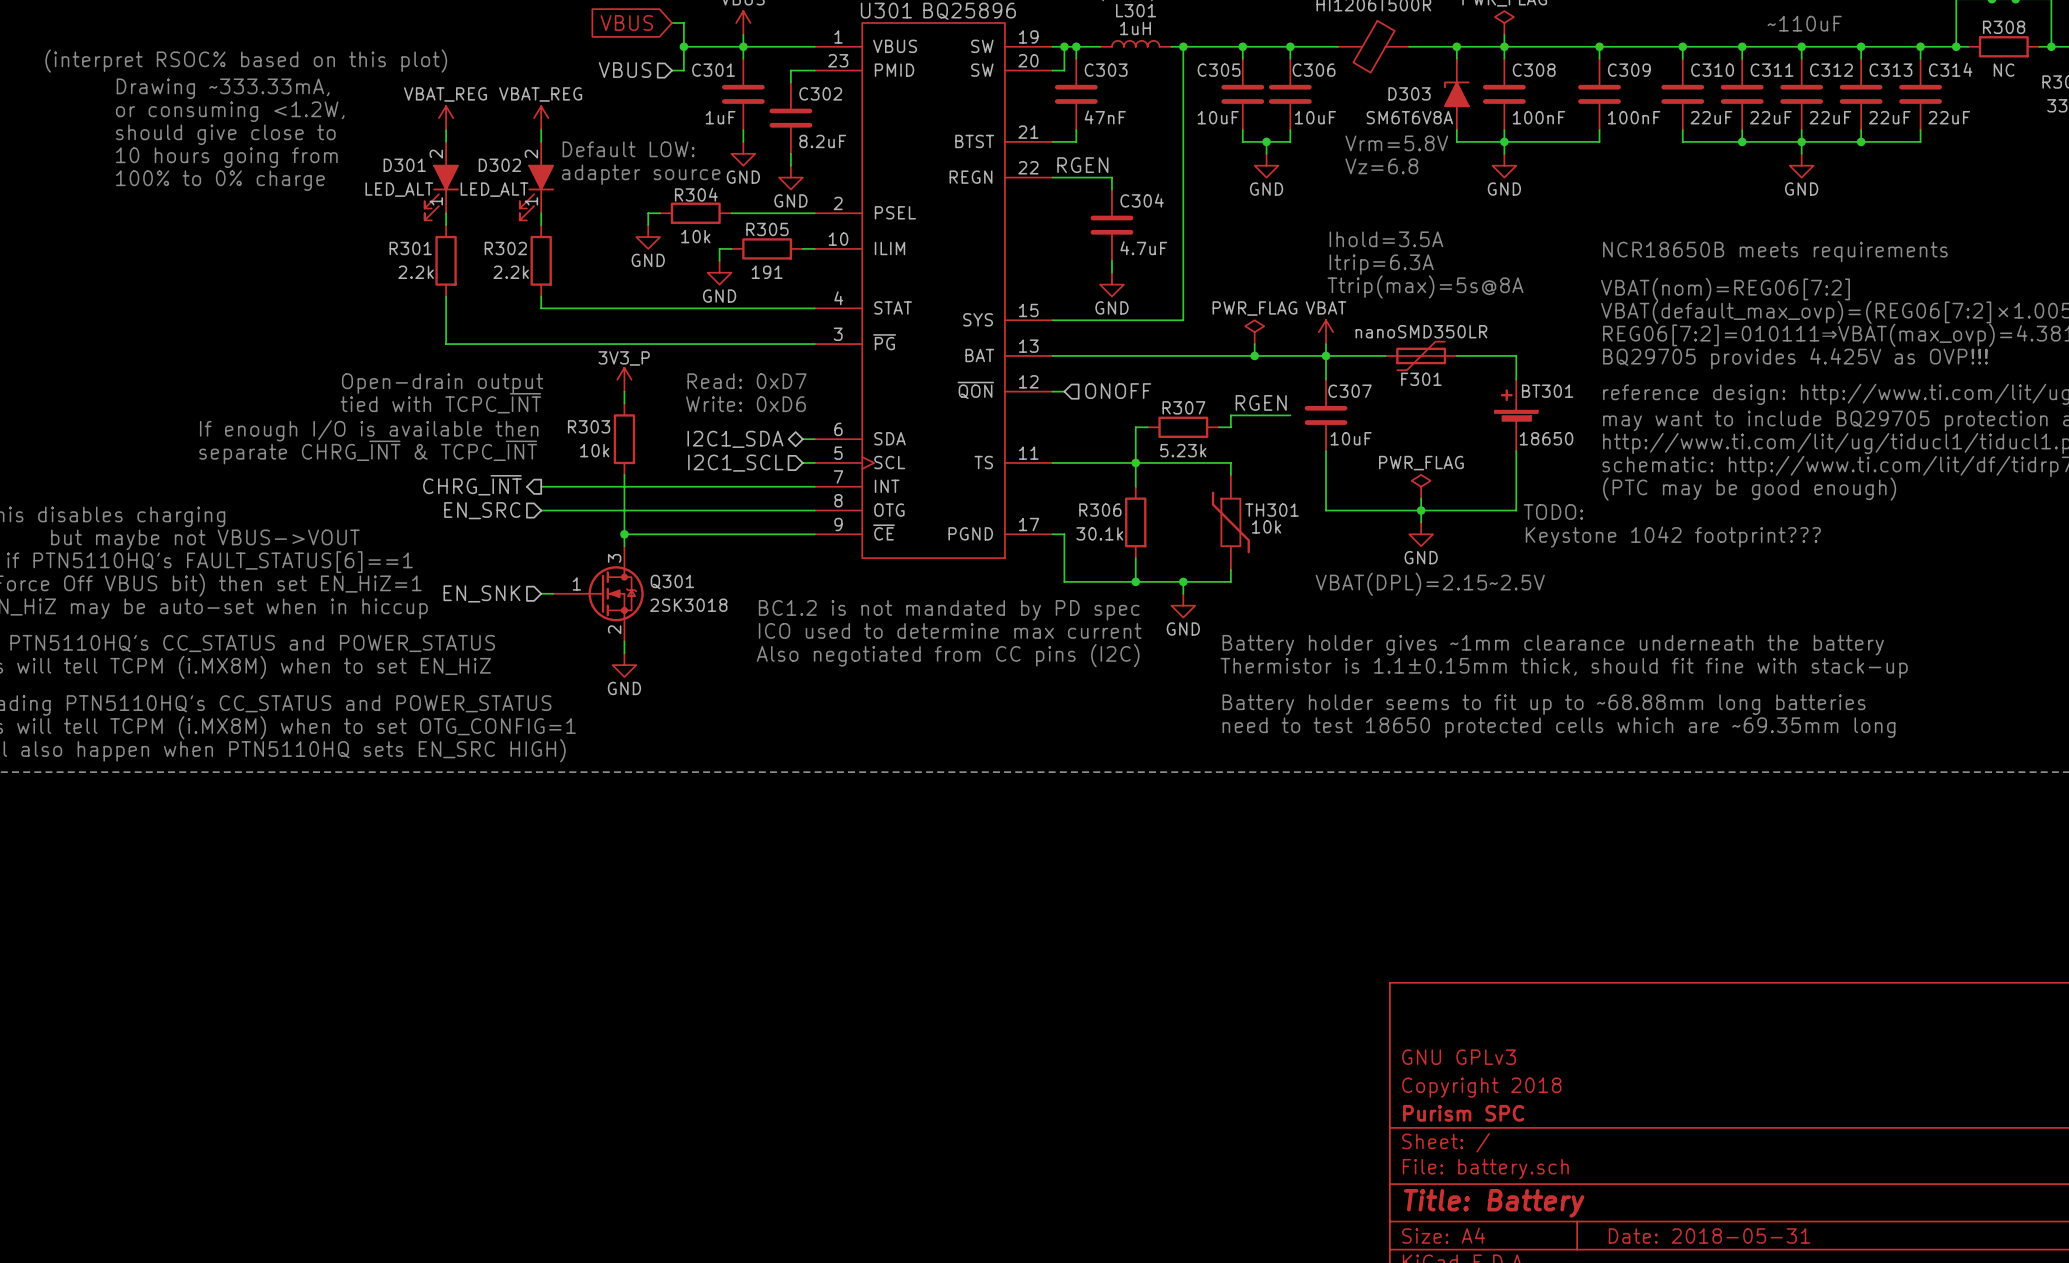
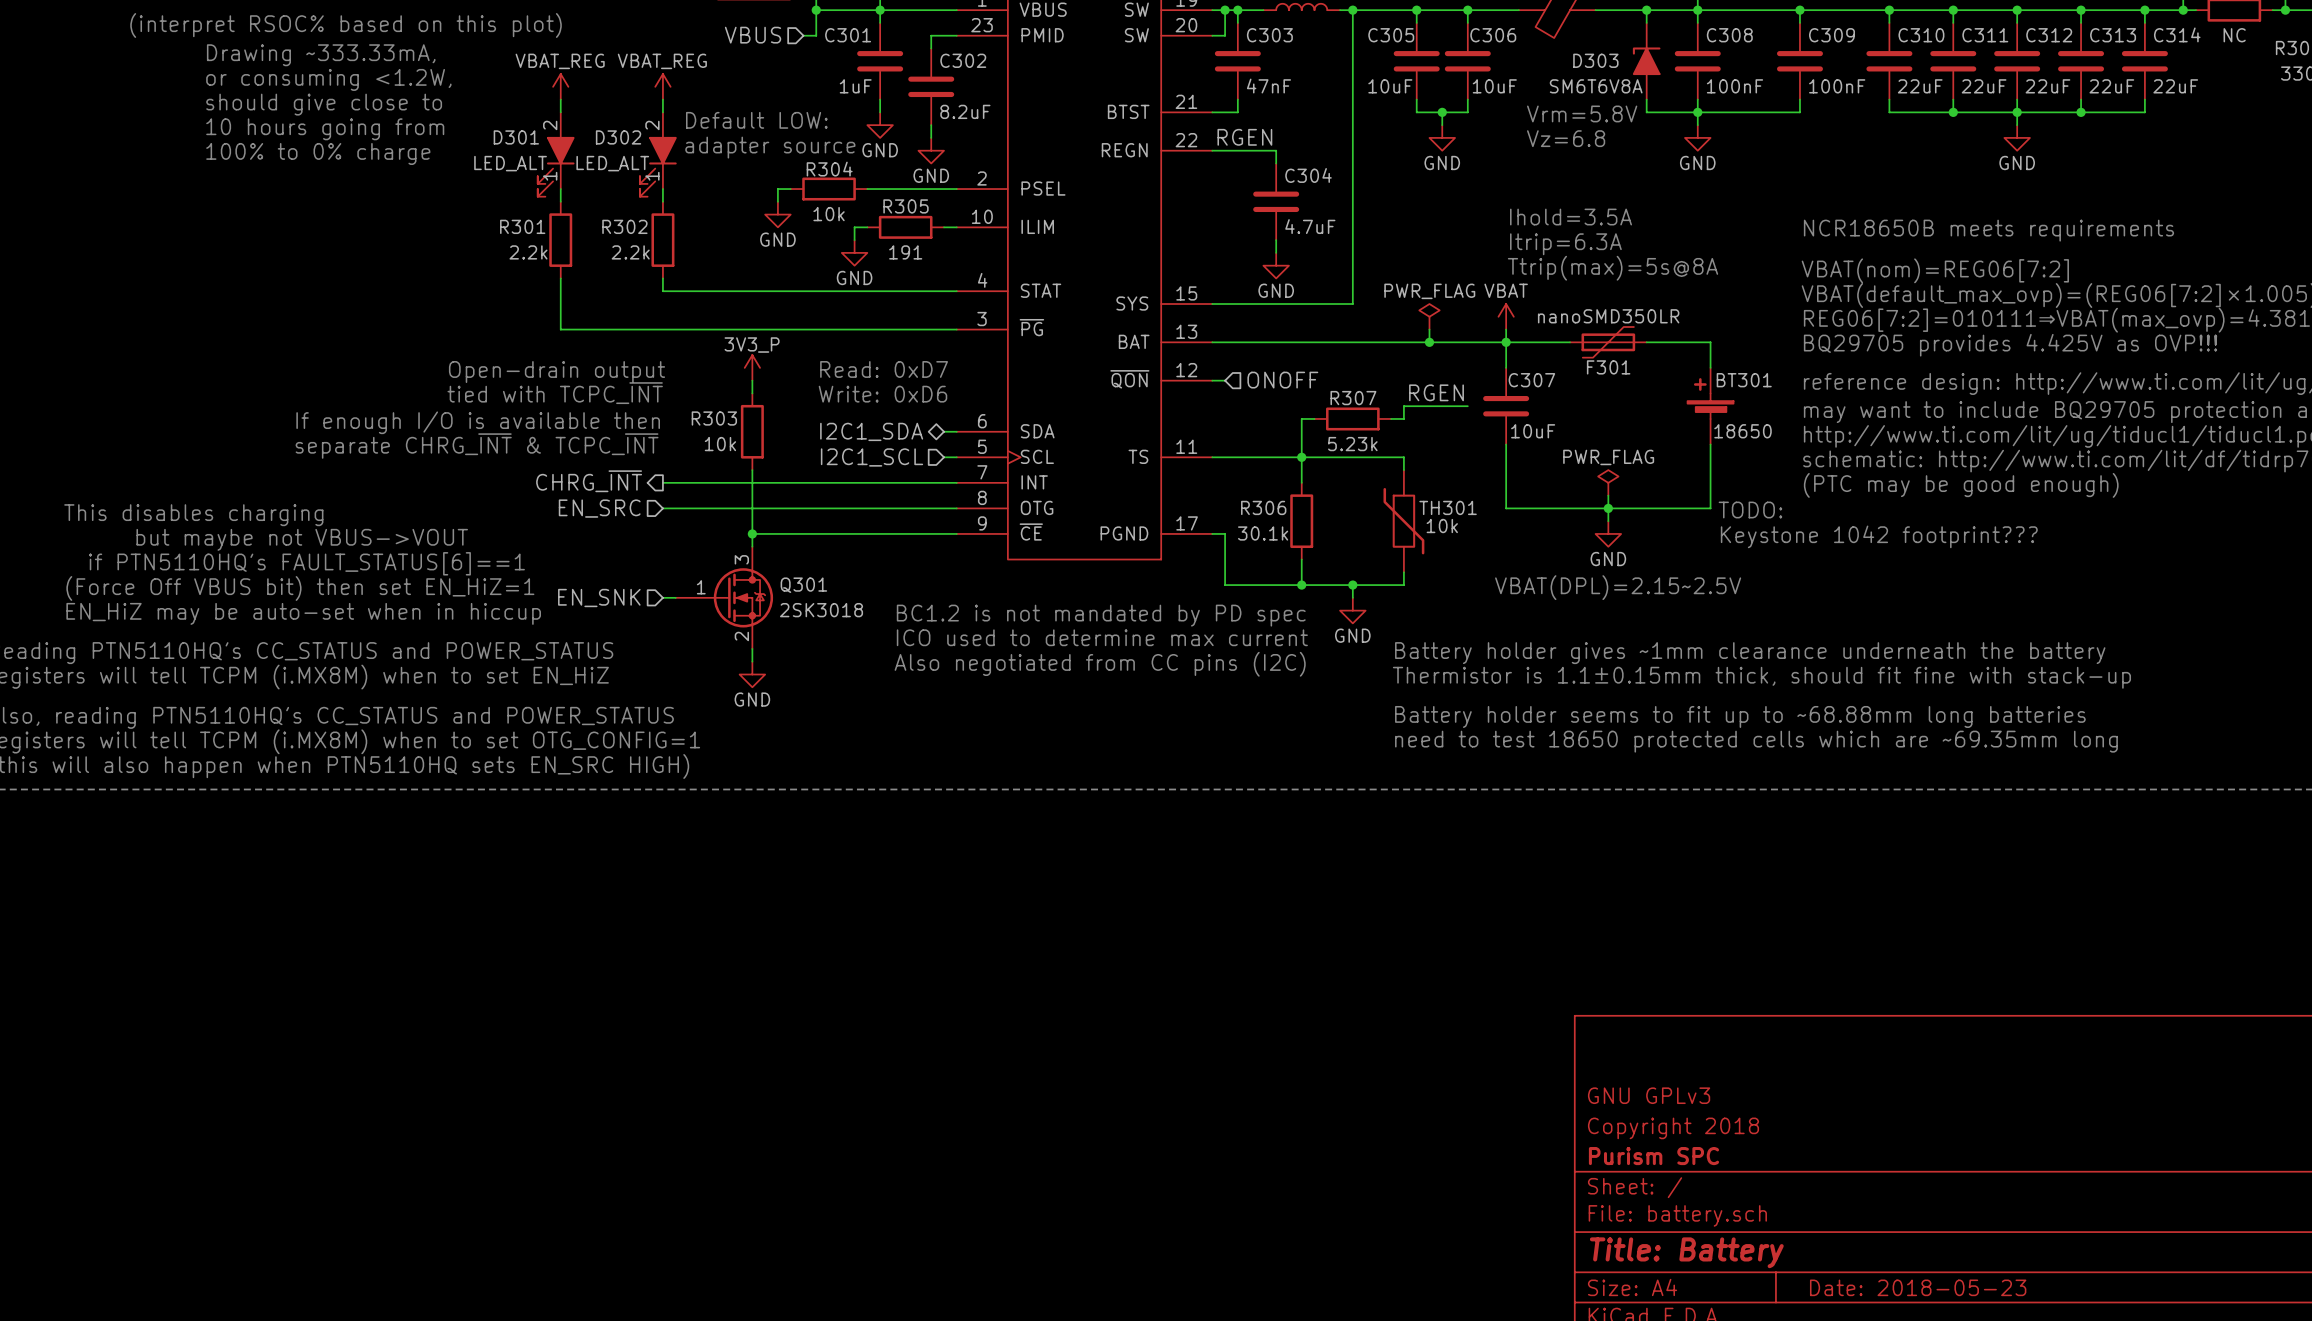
title block: Date: 2018-05-31 (1709, 1235) -> Date: 2018-05-23 (1918, 1287)

